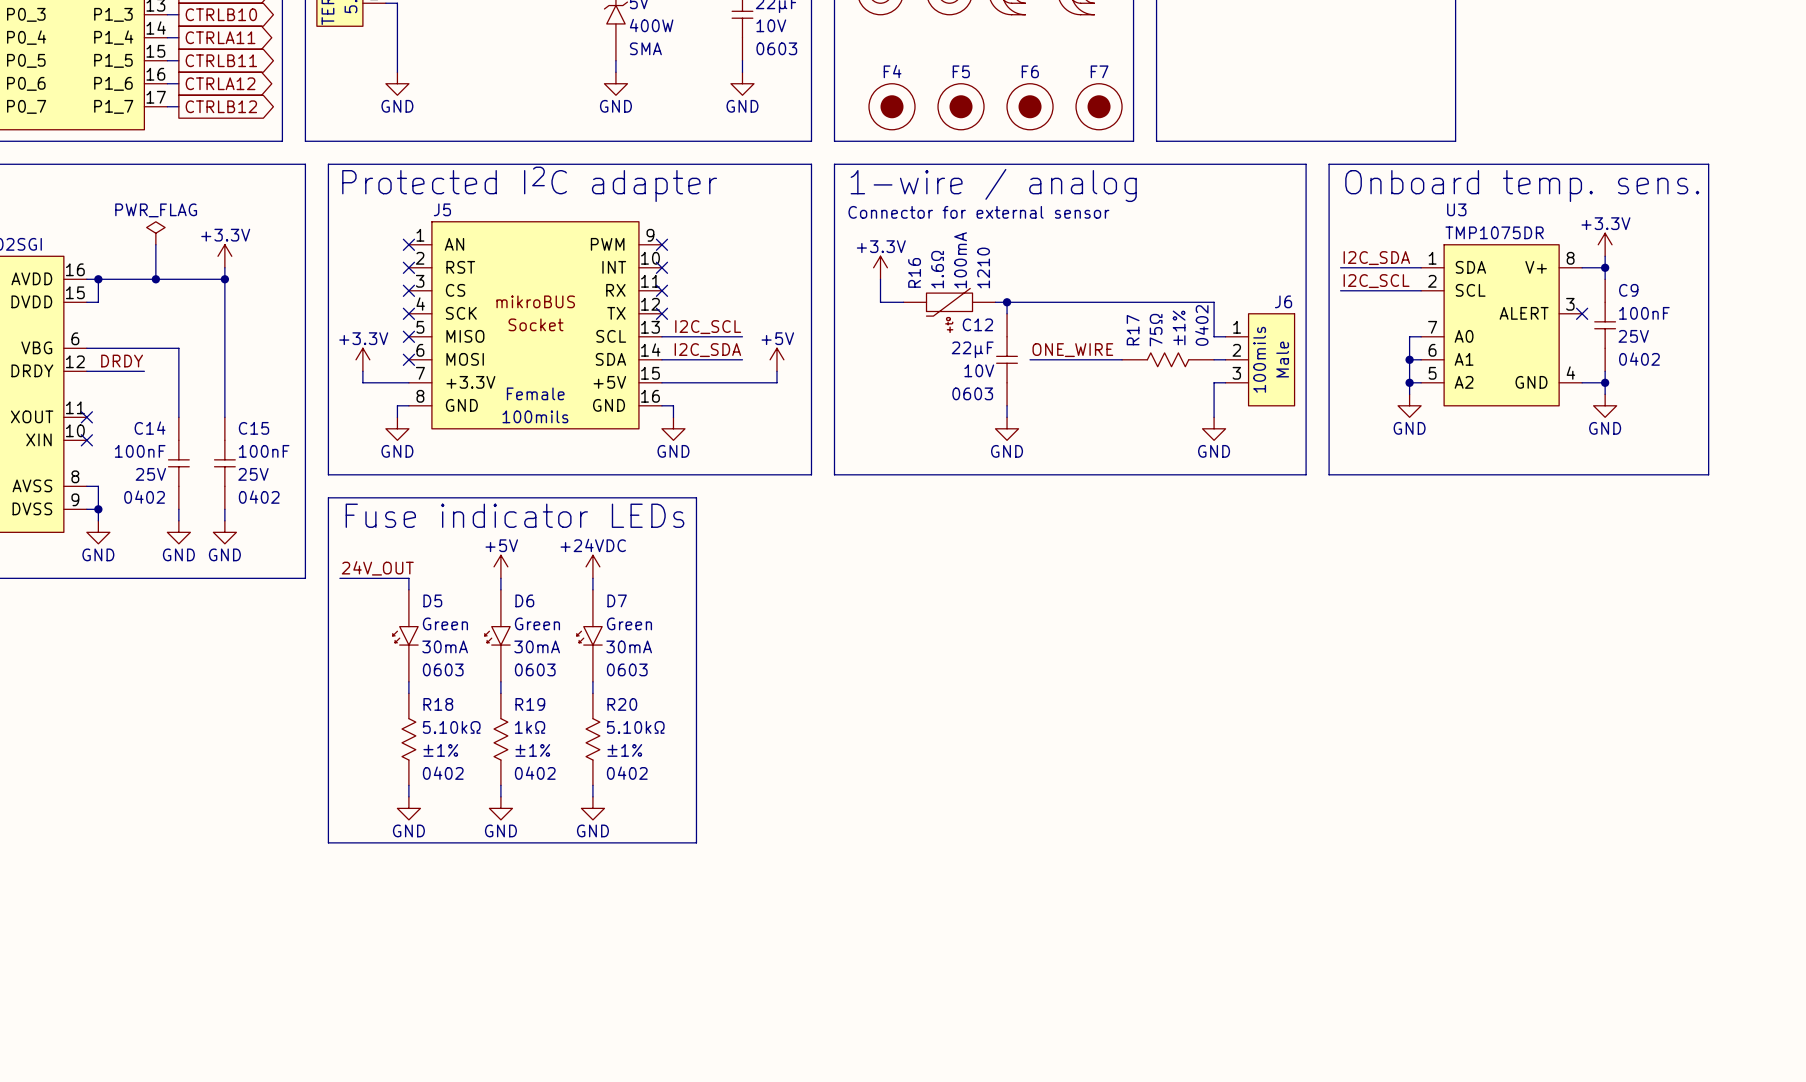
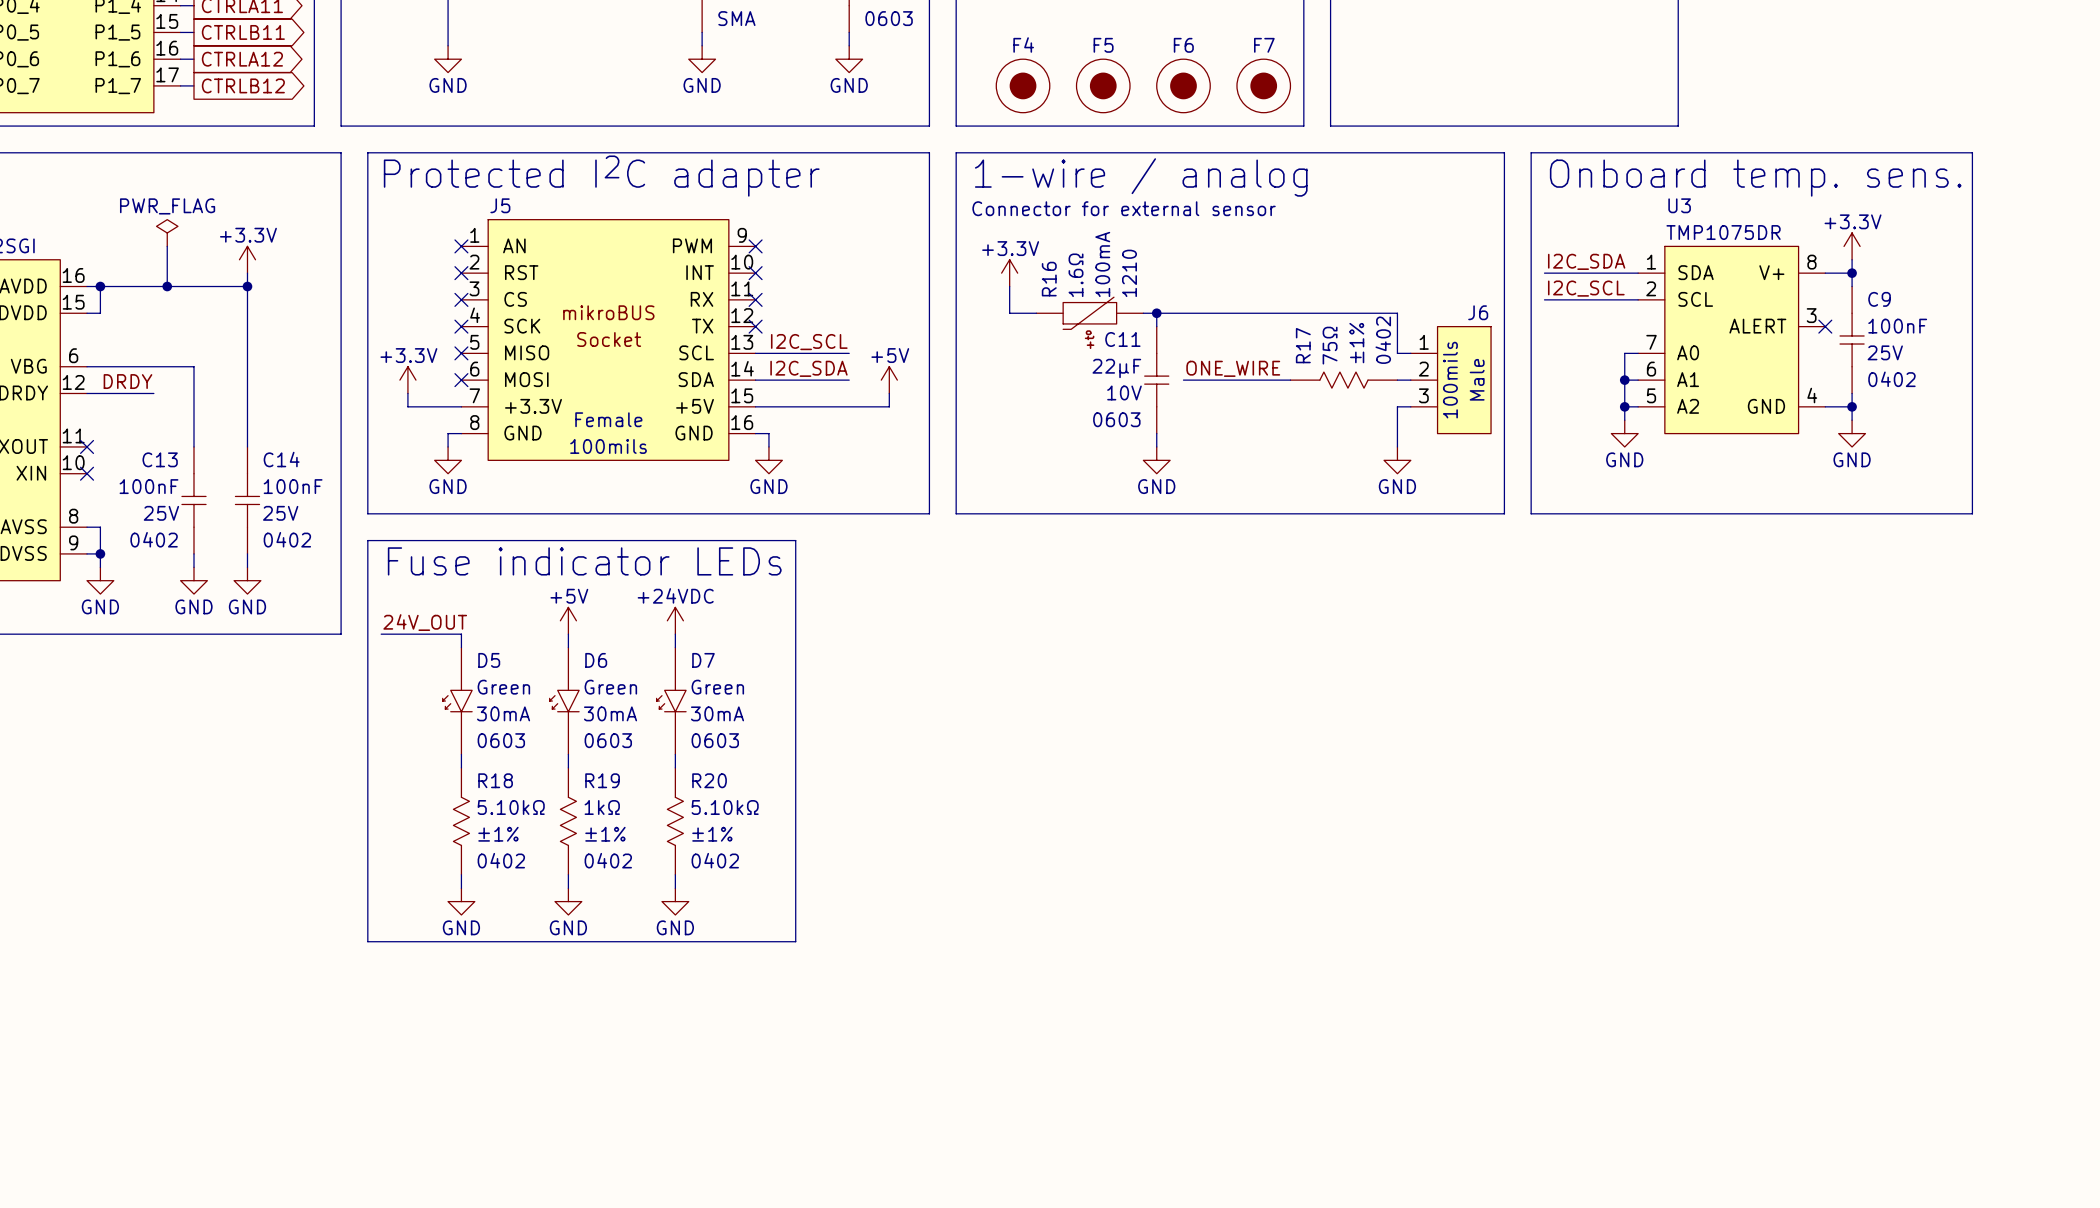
C12 name: C12 (977, 324) -> C11 (1122, 339)
C14 name: C14 (150, 428) -> C13 (160, 459)
C15 name: C15 (254, 428) -> C14 (281, 459)

